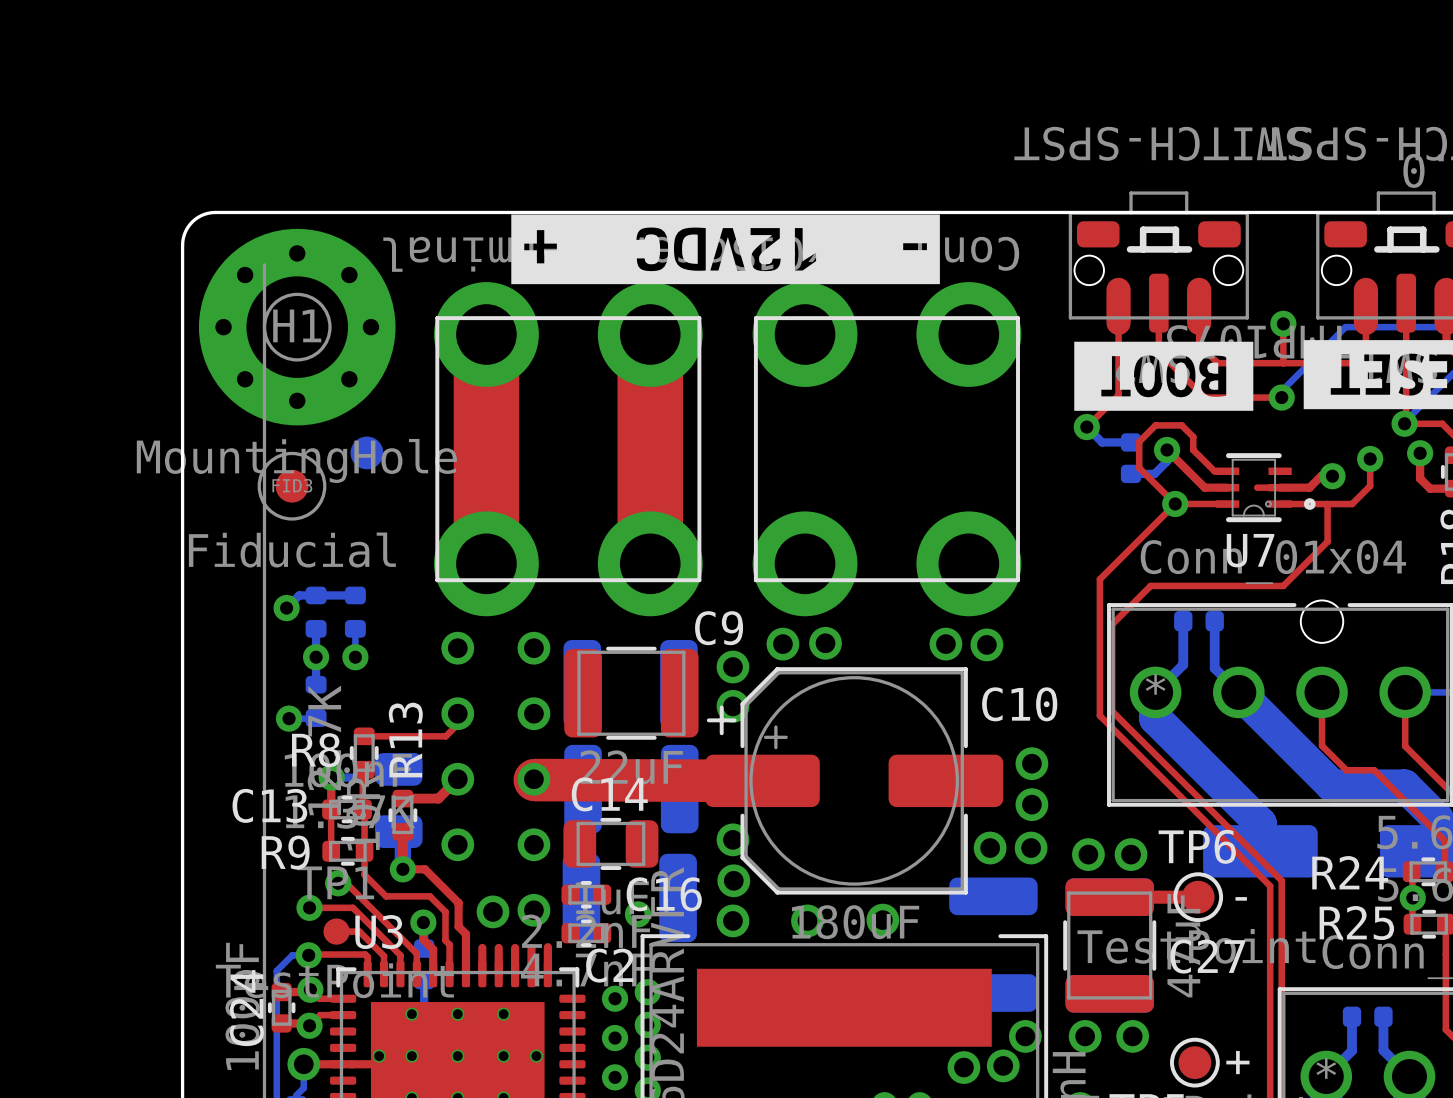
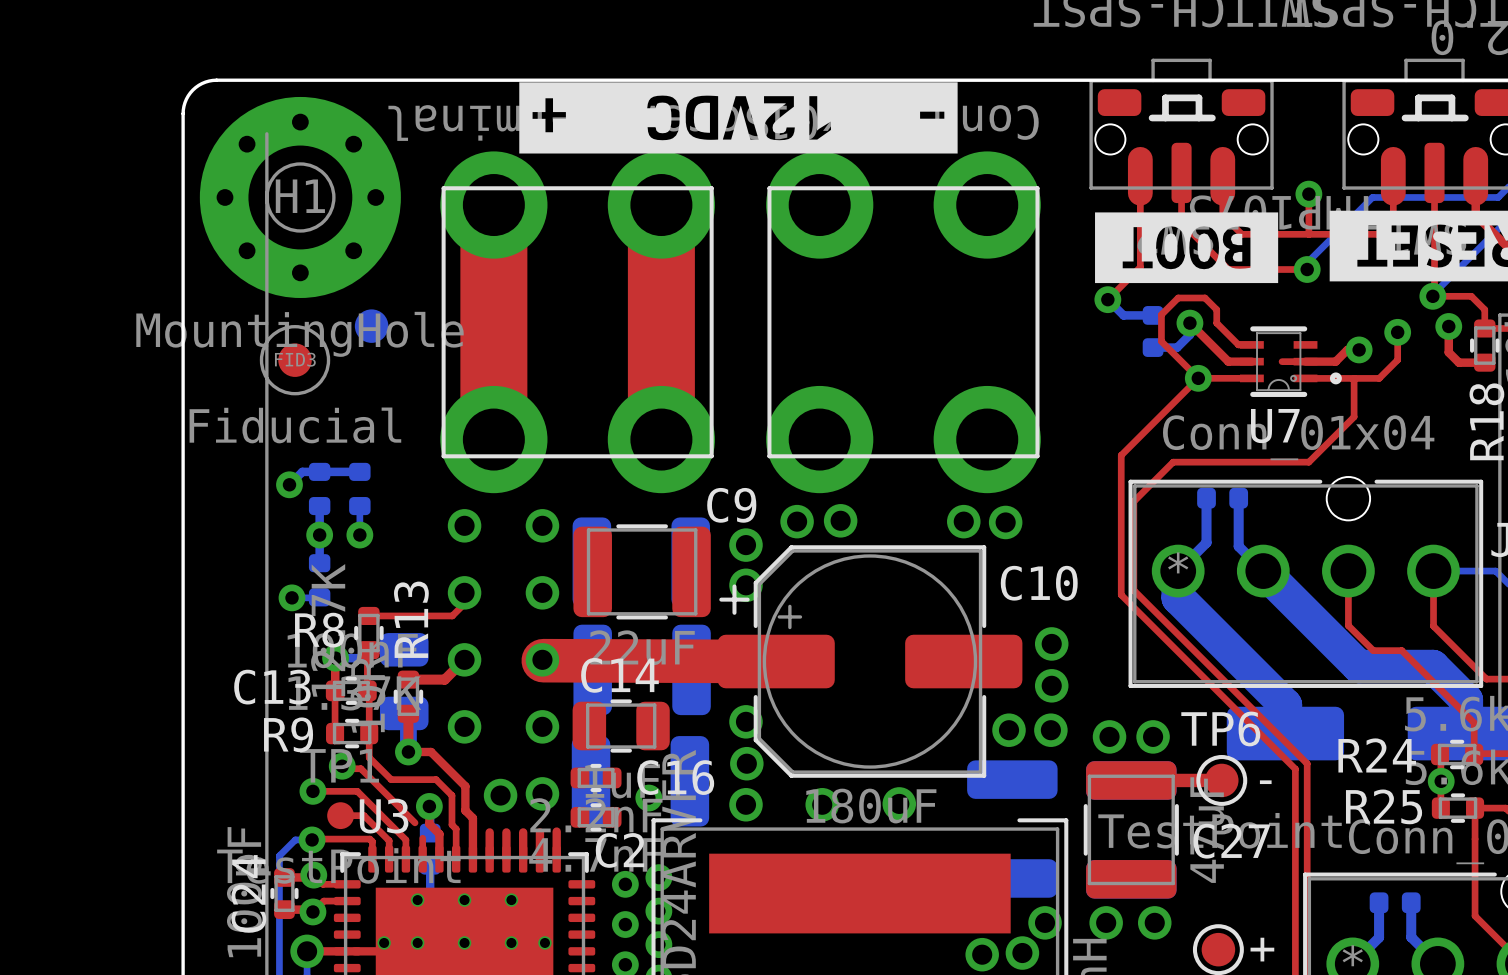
top track: (348, 885) (416, 953) -> (353, 768) (360, 768) (415, 822)

